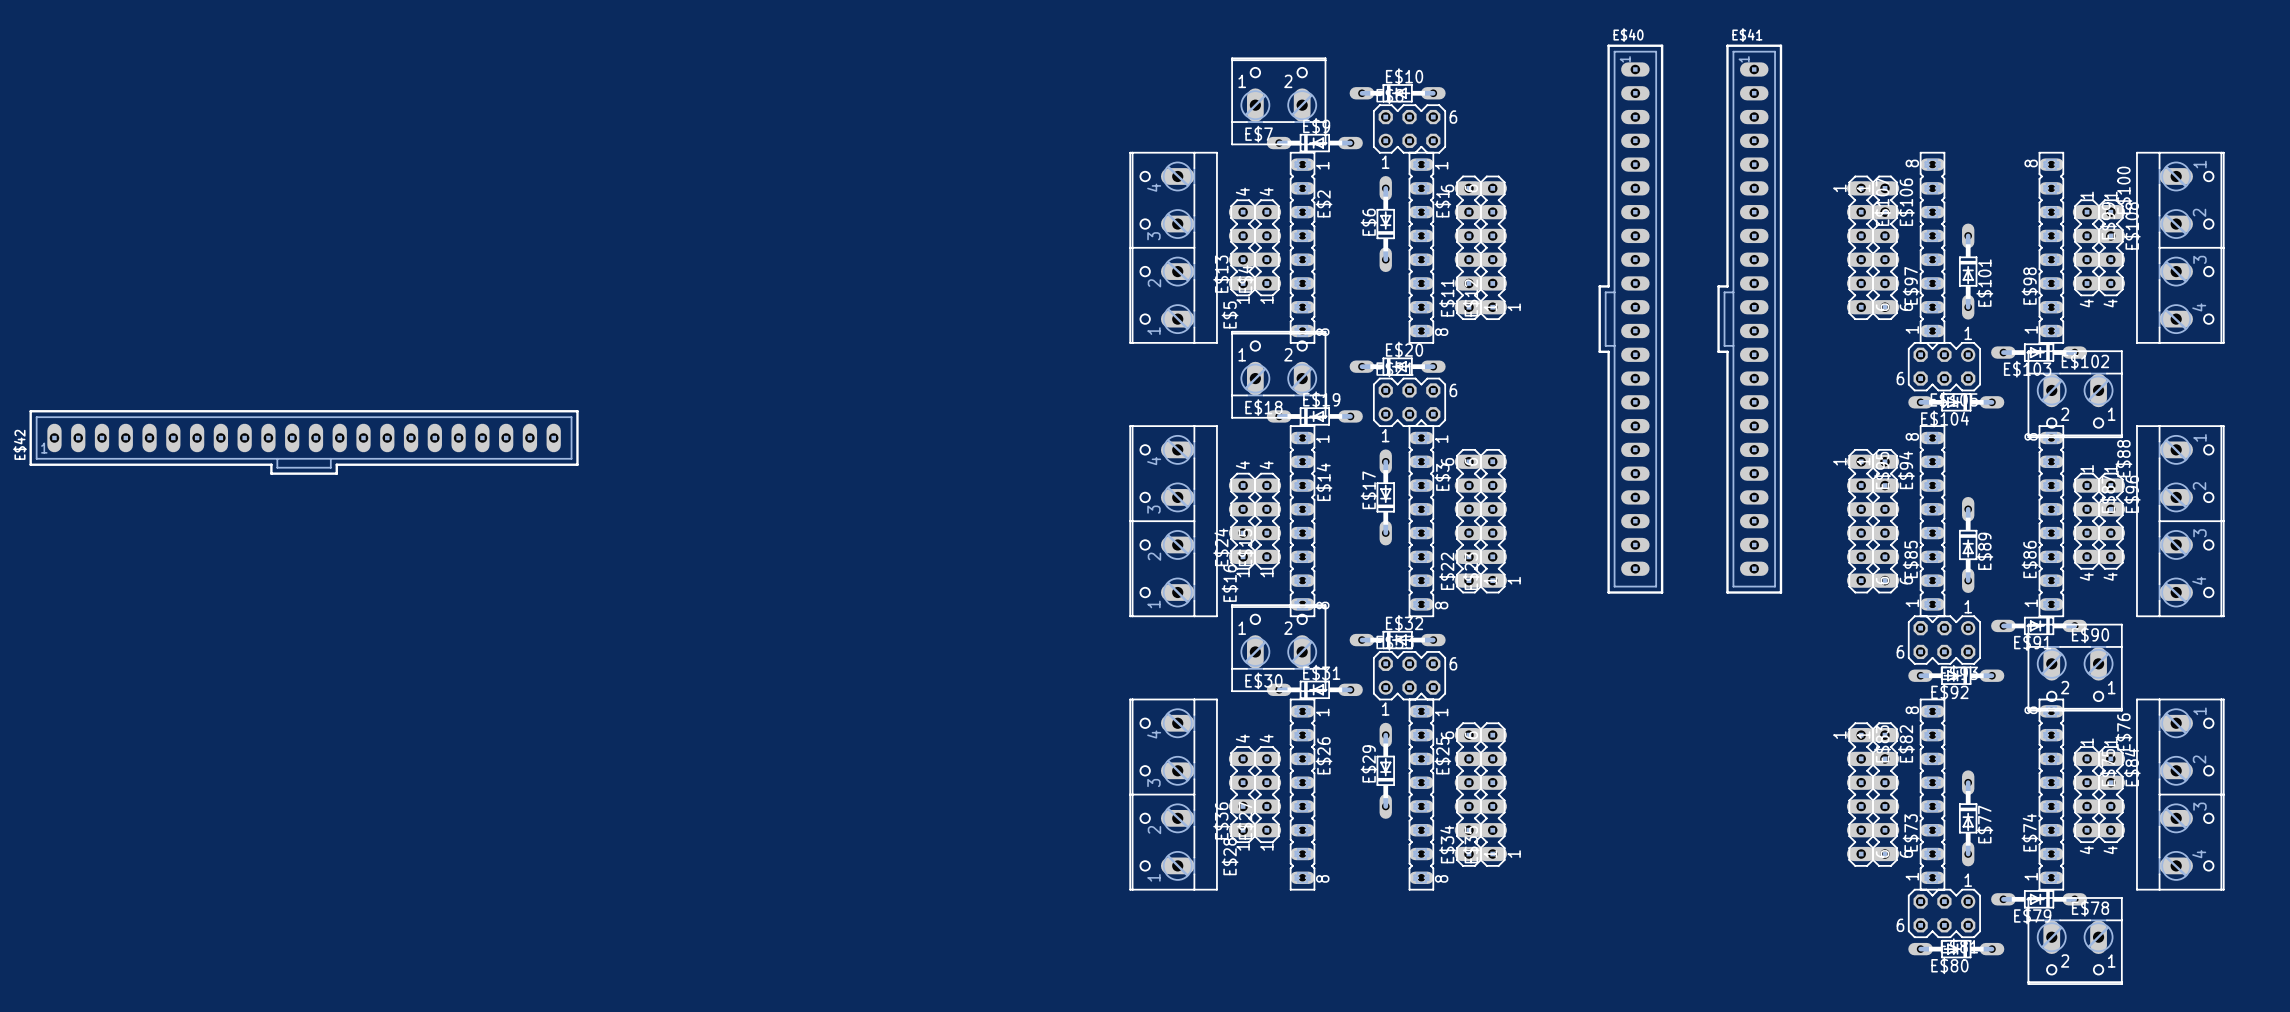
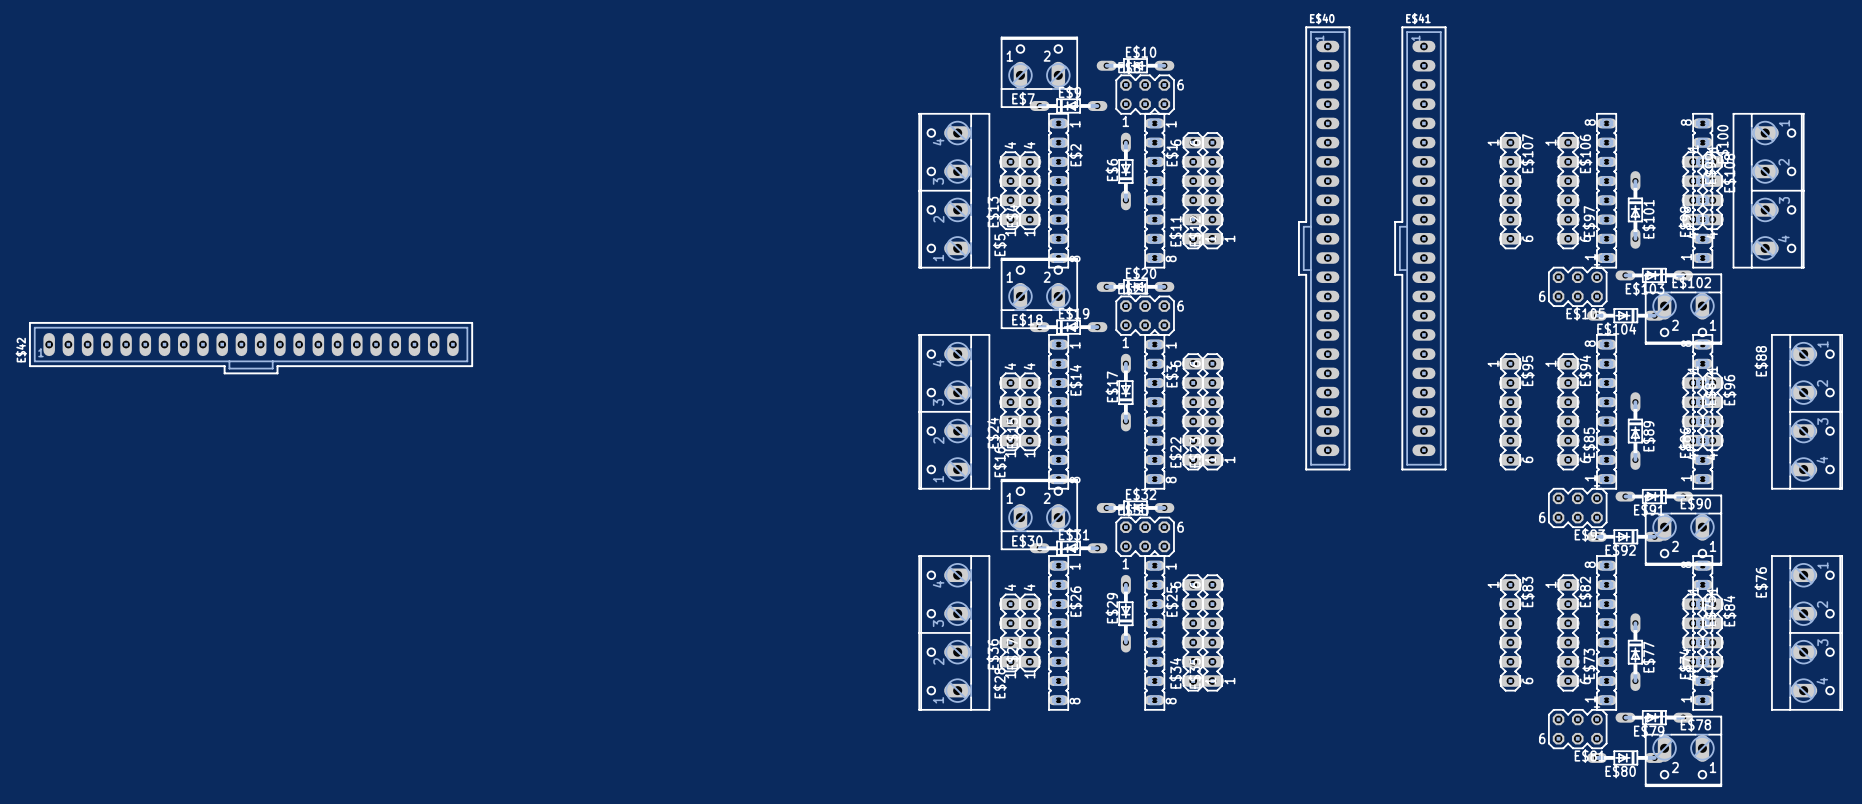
E$106 position: (1884, 247) -> (1568, 190)
E$97 position: (1932, 247) -> (1606, 190)
E$98 position: (2051, 247) -> (1702, 190)
E$101 position: (1968, 271) -> (1635, 209)
E$104 position: (1956, 402) -> (1625, 315)
E$94 position: (1884, 521) -> (1568, 411)
E$85 position: (1932, 521) -> (1606, 411)
E$86 position: (2051, 521) -> (1702, 411)
E$88 position: (2180, 521) -> (1807, 411)
E$89 position: (1968, 544) -> (1635, 431)
E$92 position: (1956, 675) -> (1625, 536)
E$82 position: (1884, 794) -> (1568, 632)
E$73 position: (1932, 794) -> (1606, 632)
E$74 position: (2051, 794) -> (1702, 632)
E$76 position: (2180, 794) -> (1807, 632)
E$77 position: (1968, 818) -> (1635, 652)
E$80 position: (1956, 949) -> (1625, 757)

